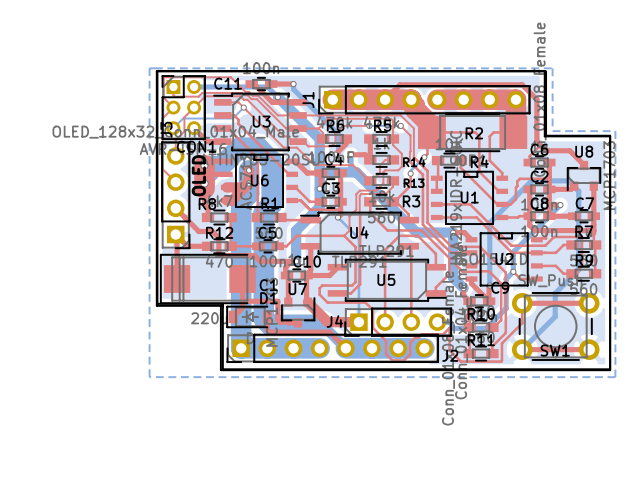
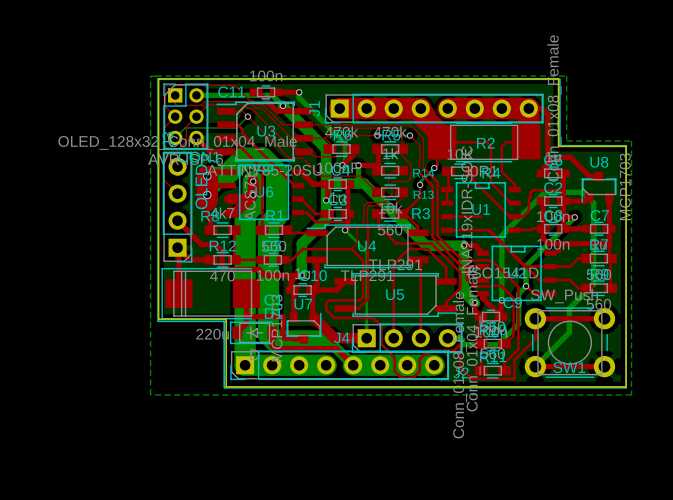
top track: (385, 99) (400, 84) (522, 84) (536, 99) (536, 141) (546, 150) (569, 150) (584, 164) -> none
top track: none -> (528, 108) (541, 108) (547, 114) (547, 169) (543, 173)
top track: none -> (555, 157) (570, 157) (589, 176) (599, 176)
top track: (470, 204) (511, 245) (545, 245) (554, 236) (581, 236) (581, 265) (574, 273) -> none
top track: none -> (488, 230) (539, 280) (550, 280)

